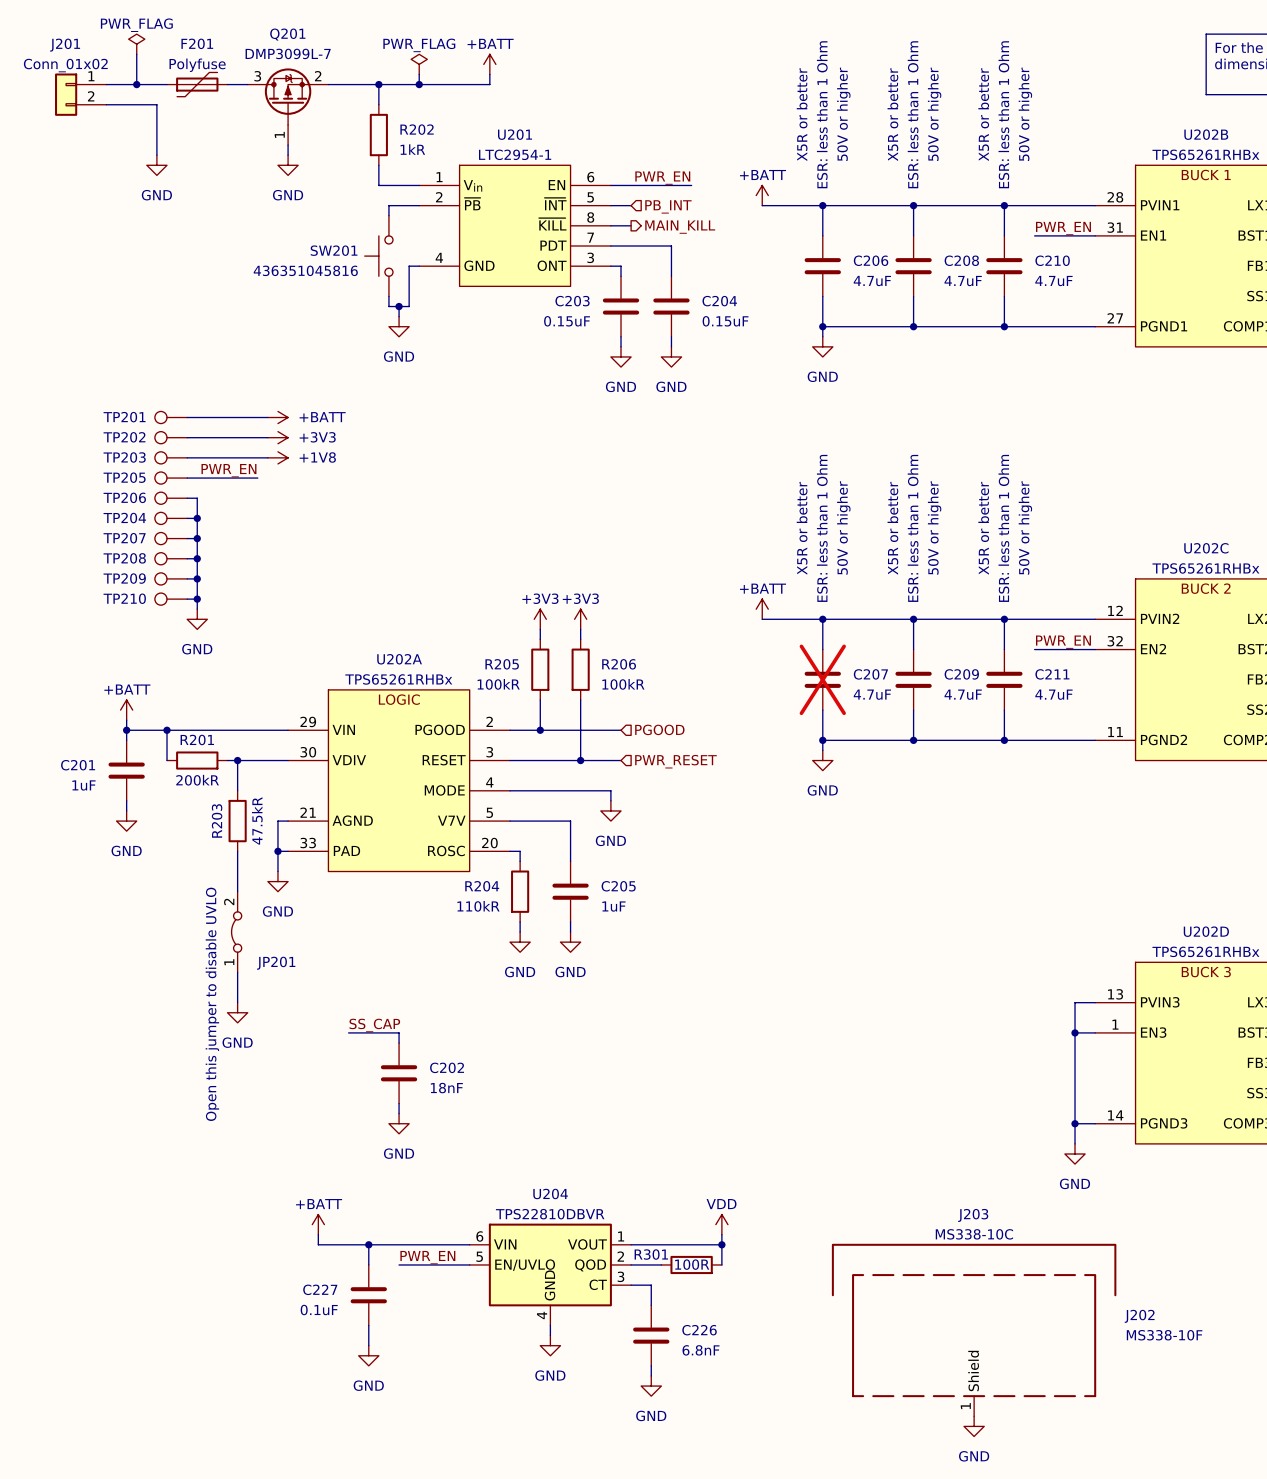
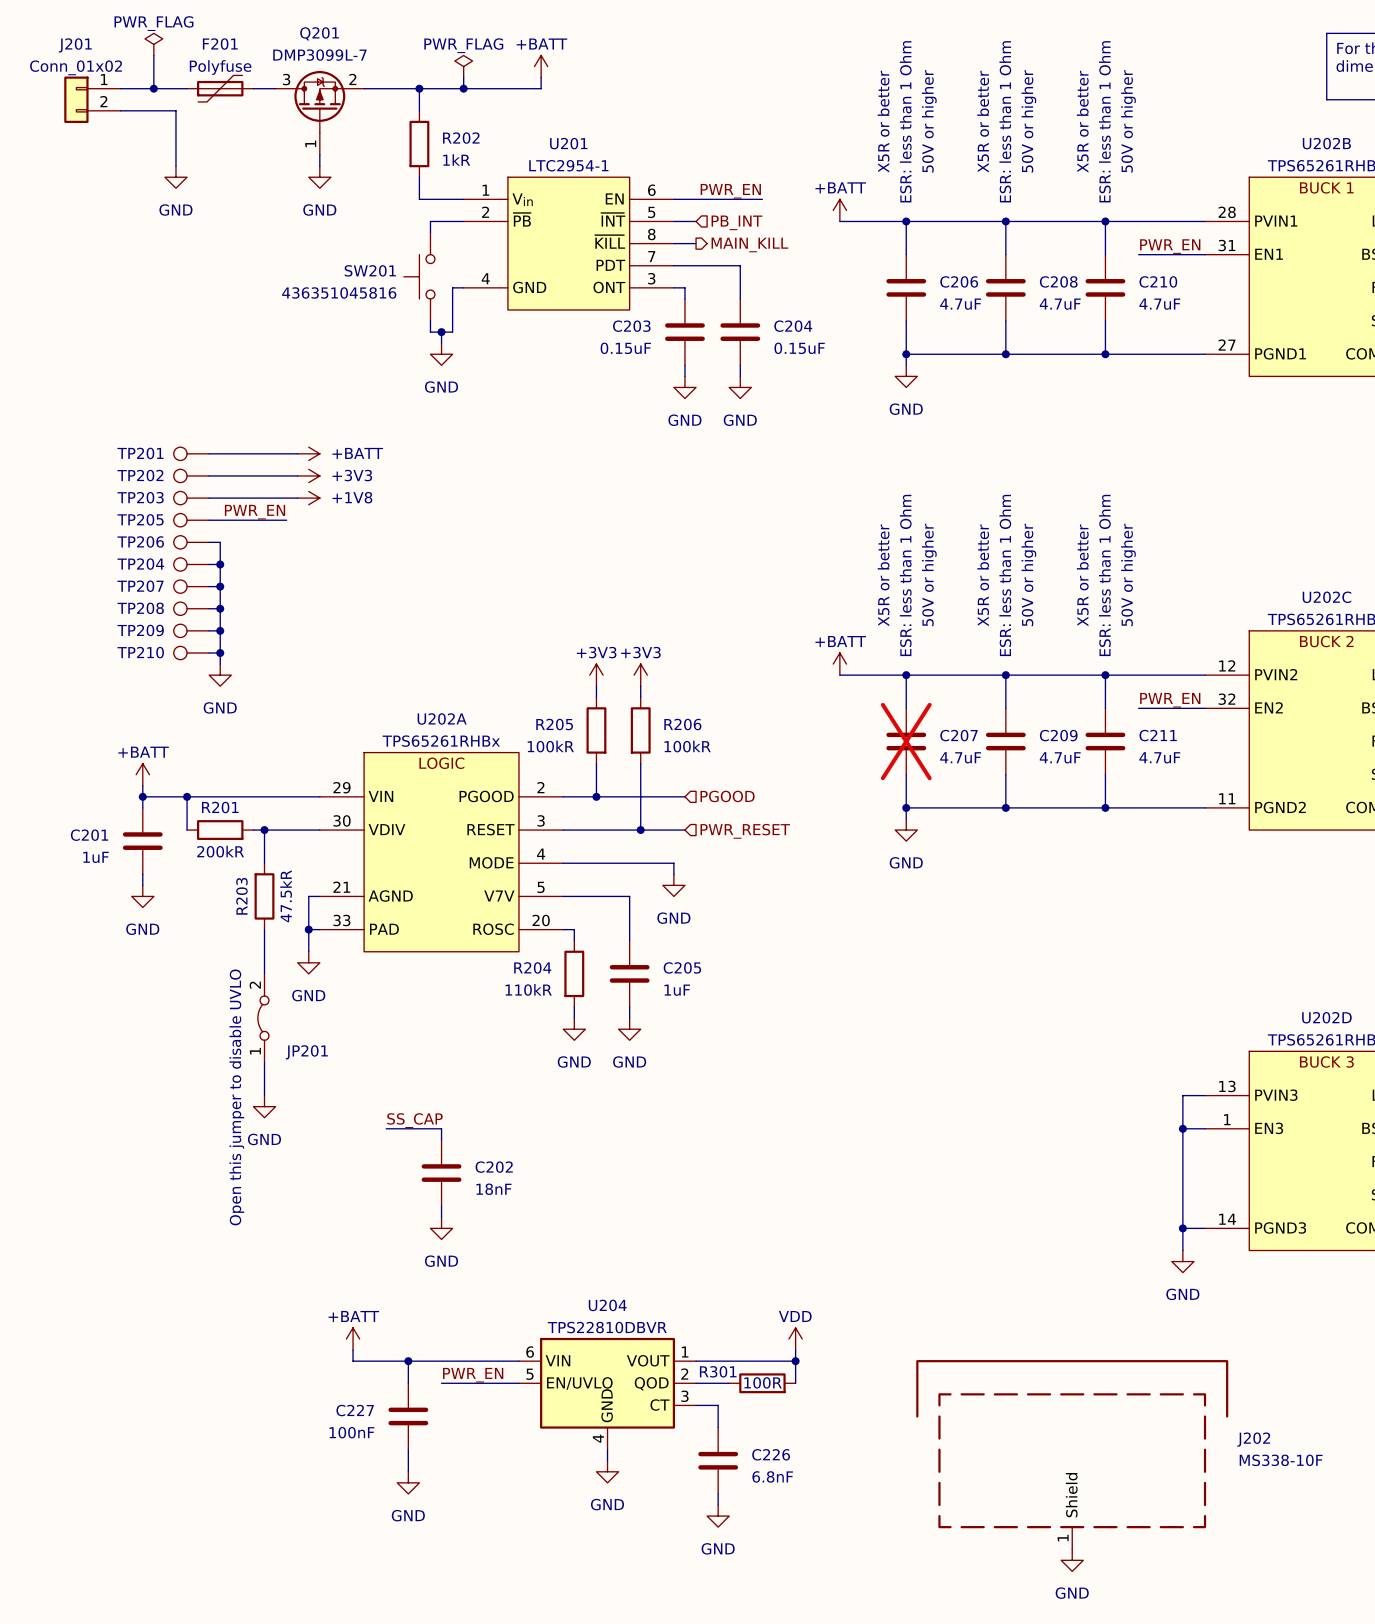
J203: MS338-10C (974, 1270) -> none
J202 symbol: [852, 1274, 1097, 1417] -> [916, 1360, 1229, 1550]
C227 value: 0.1uF (319, 1310) -> 100nF (351, 1432)

